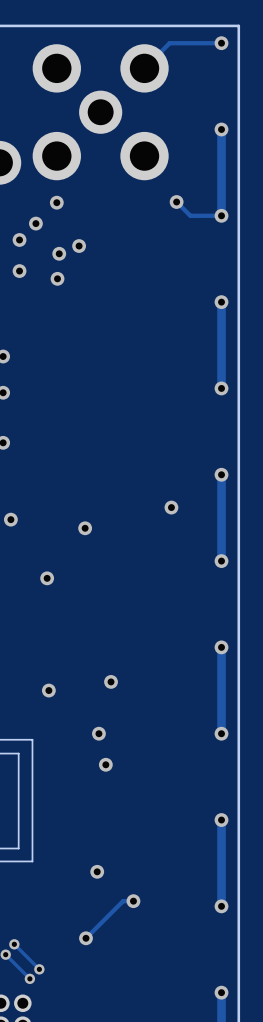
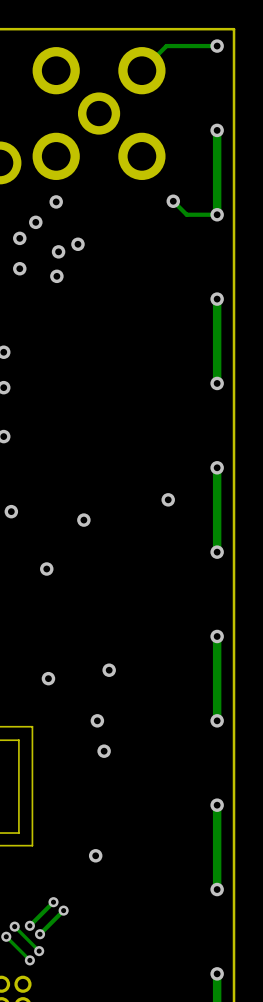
track: (133, 901) (123, 901) (85, 938) -> none
via: (133, 901) -> none
track: none -> (53, 902) (29, 925)
via: none -> (53, 902)
track: none -> (63, 910) (40, 934)
via: none -> (63, 910)
via: (85, 938) -> none
via: none -> (29, 925)
via: none -> (40, 934)

